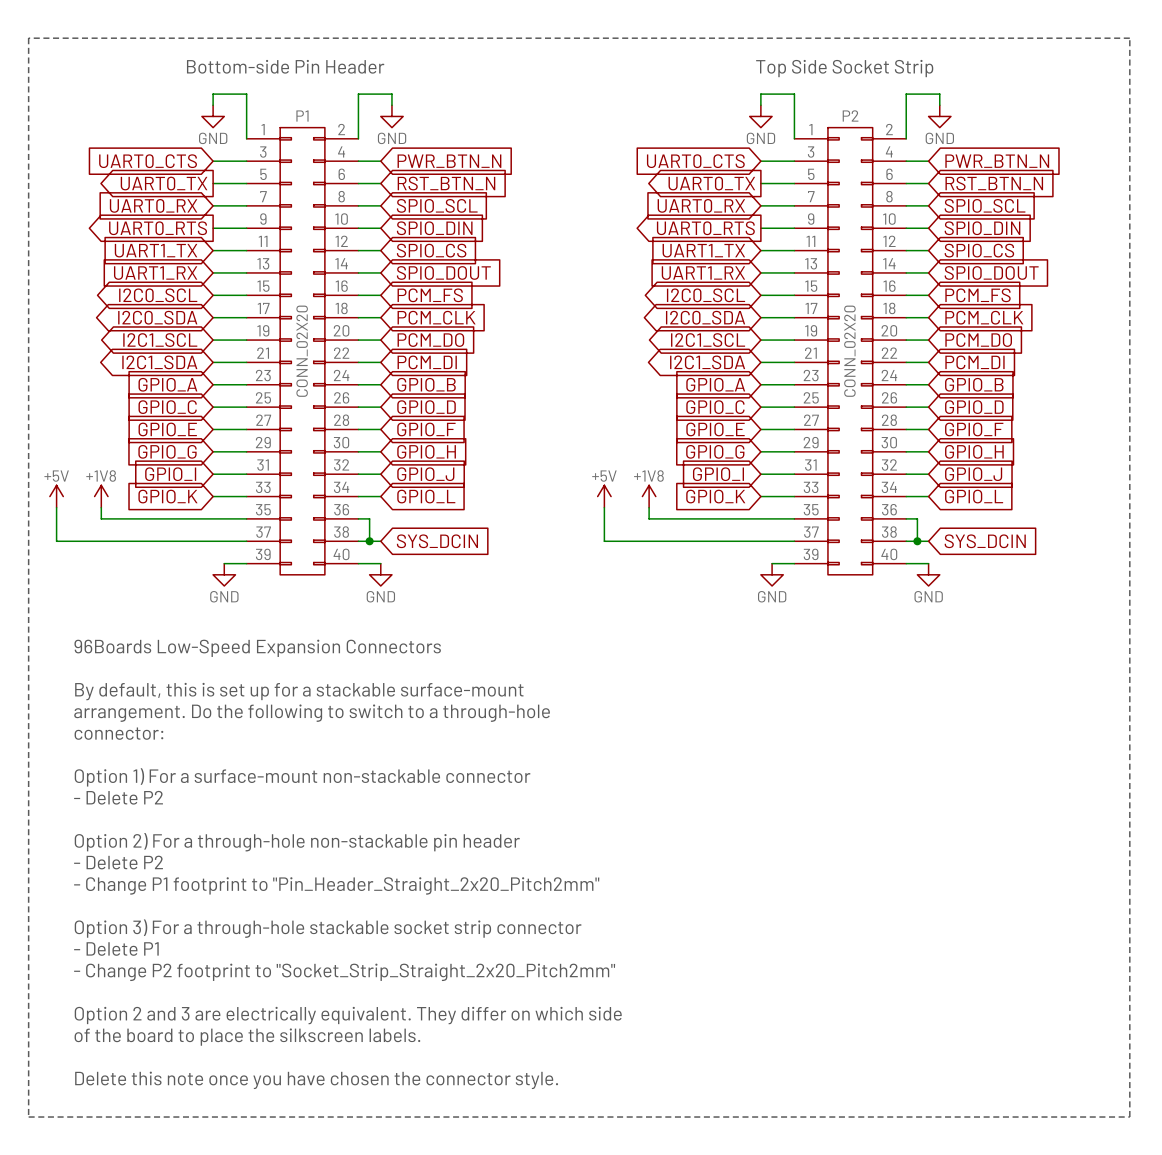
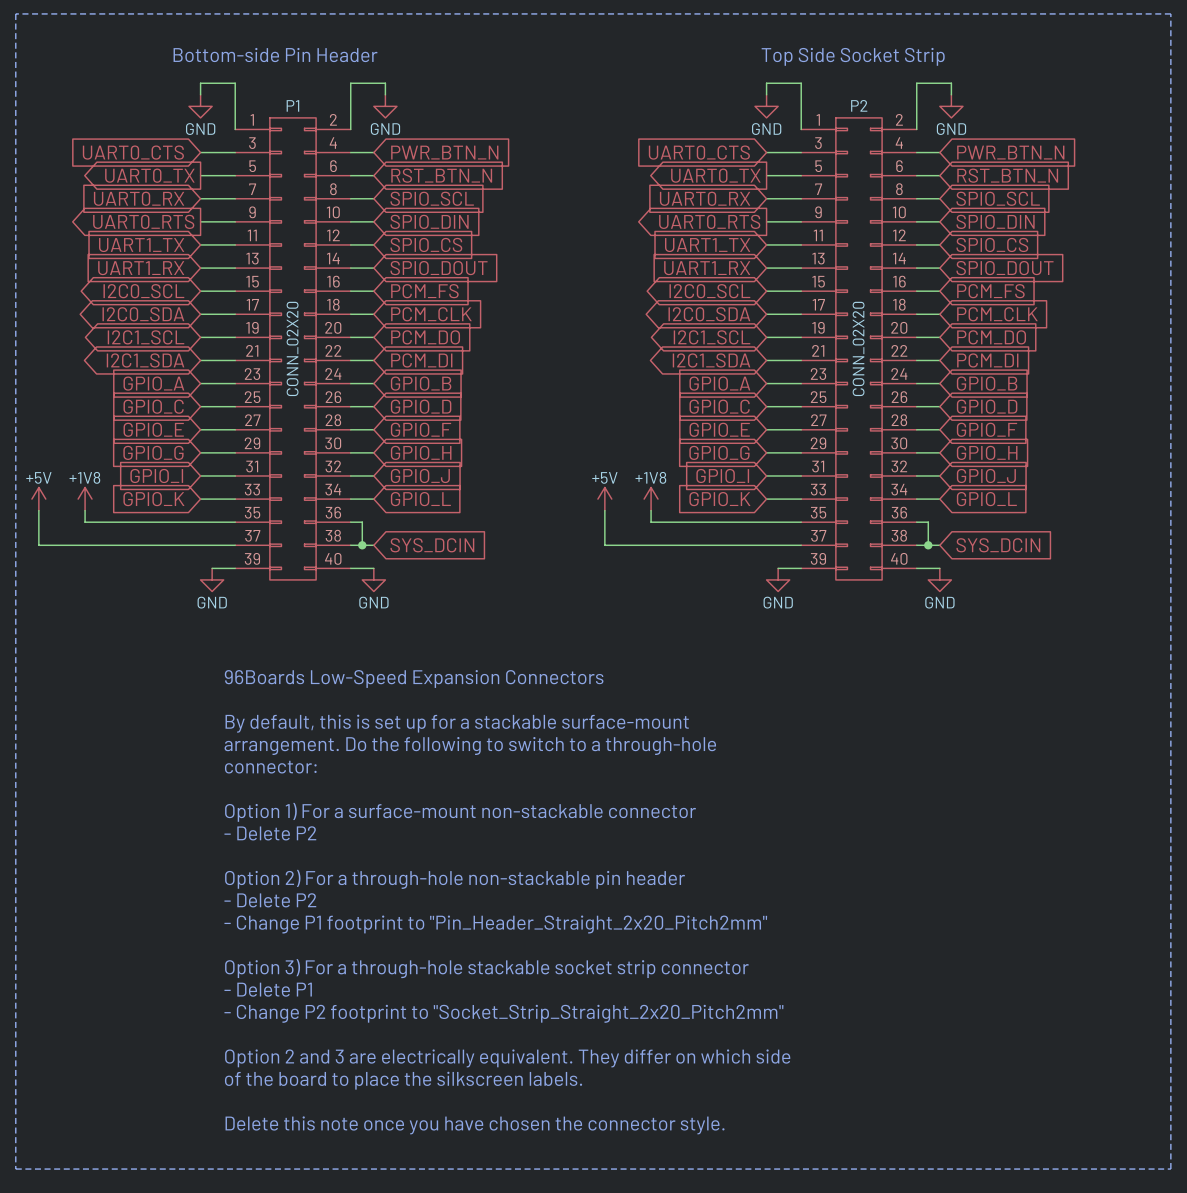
line: (28, 38) (28, 1117) (1129, 1117) (1129, 38) (28, 38) -> (15, 13) (15, 1169) (1170, 1169) (1170, 13) (15, 13)
text position: 96Boards Low-Speed Expansion Connectors (257, 648) -> 96Boards Low-Speed Expansion Connectors (414, 678)
text position: By default, this is set up for a stackable surface-mount (299, 691) -> By default, this is set up for a stackable surface-mount (457, 723)
text position: arrangement. Do the following to switch to a through-hole (312, 713) -> arrangement. Do the following to switch to a through-hole (470, 745)
text position: connector: (118, 733) -> connector: (270, 767)
text position: Option 1) For a surface-mount non-stackable connector (302, 777) -> Option 1) For a surface-mount non-stackable connector (460, 812)
text: - Delete P2 (118, 797) -> none
text: none -> - Delete P2 (270, 833)
text position: Option 2) For a through-hole non-stackable pin header (297, 842) -> Option 2) For a through-hole non-stackable pin header (455, 879)
text: - Delete P2 (118, 862) -> none
text: none -> - Delete P2 (270, 900)
text position: - Change P1 footprint to "Pin_Header_Straight_2x20_Pitch2mm" (336, 885) -> - Change P1 footprint to "Pin_Header_Straight_2x20_Pitch2mm" (495, 924)
text position: Option 3) For a through-hole stackable socket strip connector (328, 928) -> Option 3) For a through-hole stackable socket strip connector (486, 968)
text position: - Delete P1 (116, 949) -> - Delete P1 (268, 989)
text position: - Change P2 footprint to "Socket_Strip_Straight_2x20_Pitch2mm" (344, 972) -> - Change P2 footprint to "Socket_Strip_Straight_2x20_Pitch2mm" (503, 1013)
text position: Option 2 and 3 are electrically equivalent. They differ on which side (348, 1015) -> Option 2 and 3 are electrically equivalent. They differ on which side (507, 1058)
text position: of the board to place the silkscreen labels. (247, 1037) -> of the board to place the silkscreen labels. (403, 1080)
text position: Delete this note once you have chosen the connector style. (316, 1080) -> Delete this note once you have chosen the connector style. (475, 1125)

